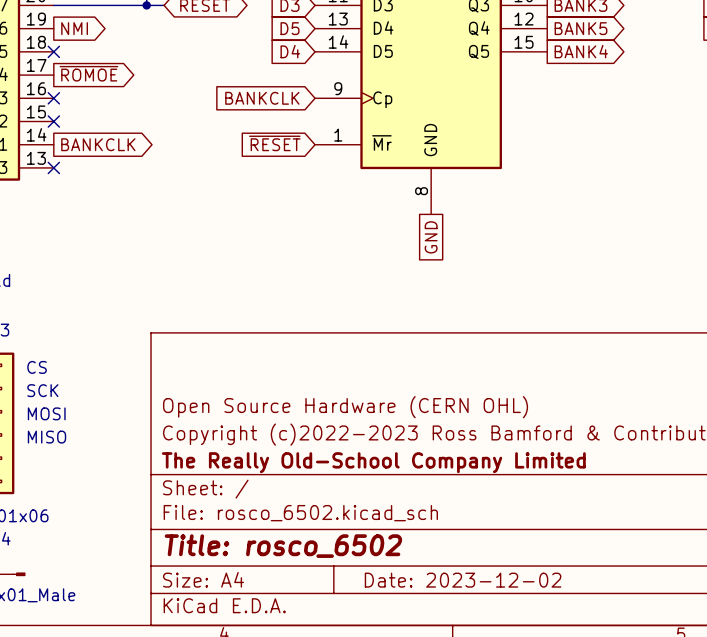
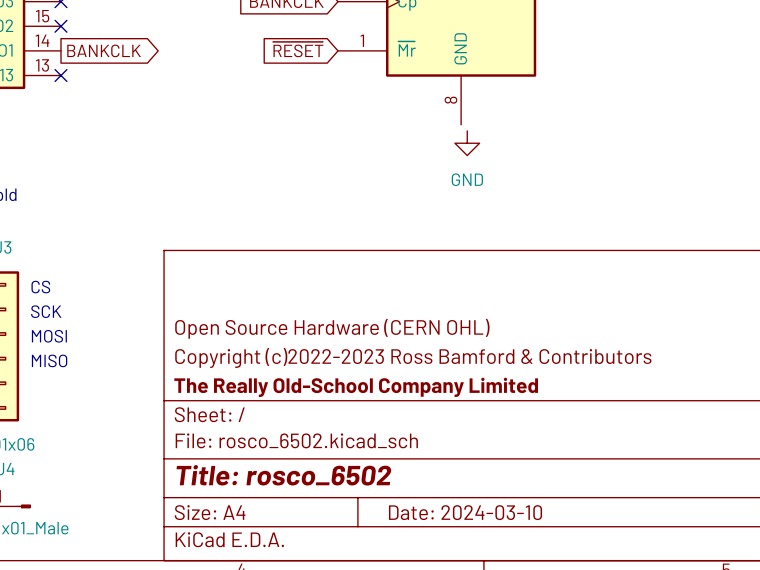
power symbol: none -> GND (467, 143)
global label: GND (431, 237) -> none
title block: Date: 2023-12-02 (463, 580) -> Date: 2024-03-10 (465, 512)

